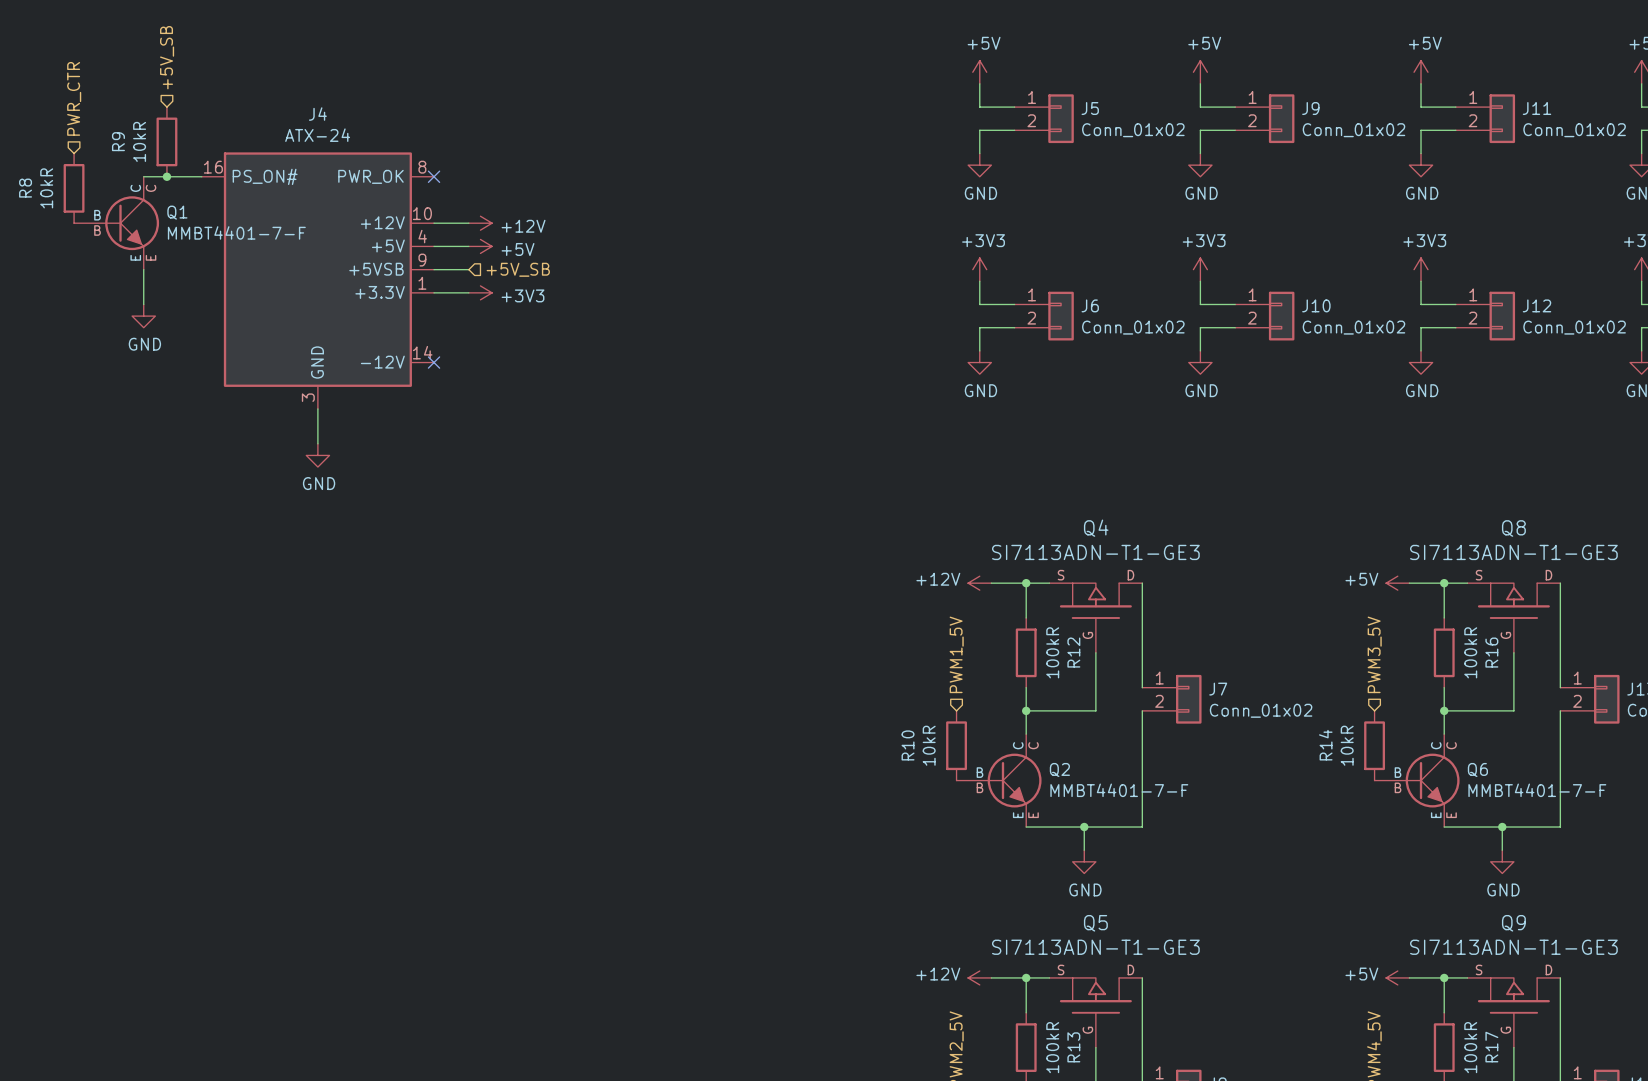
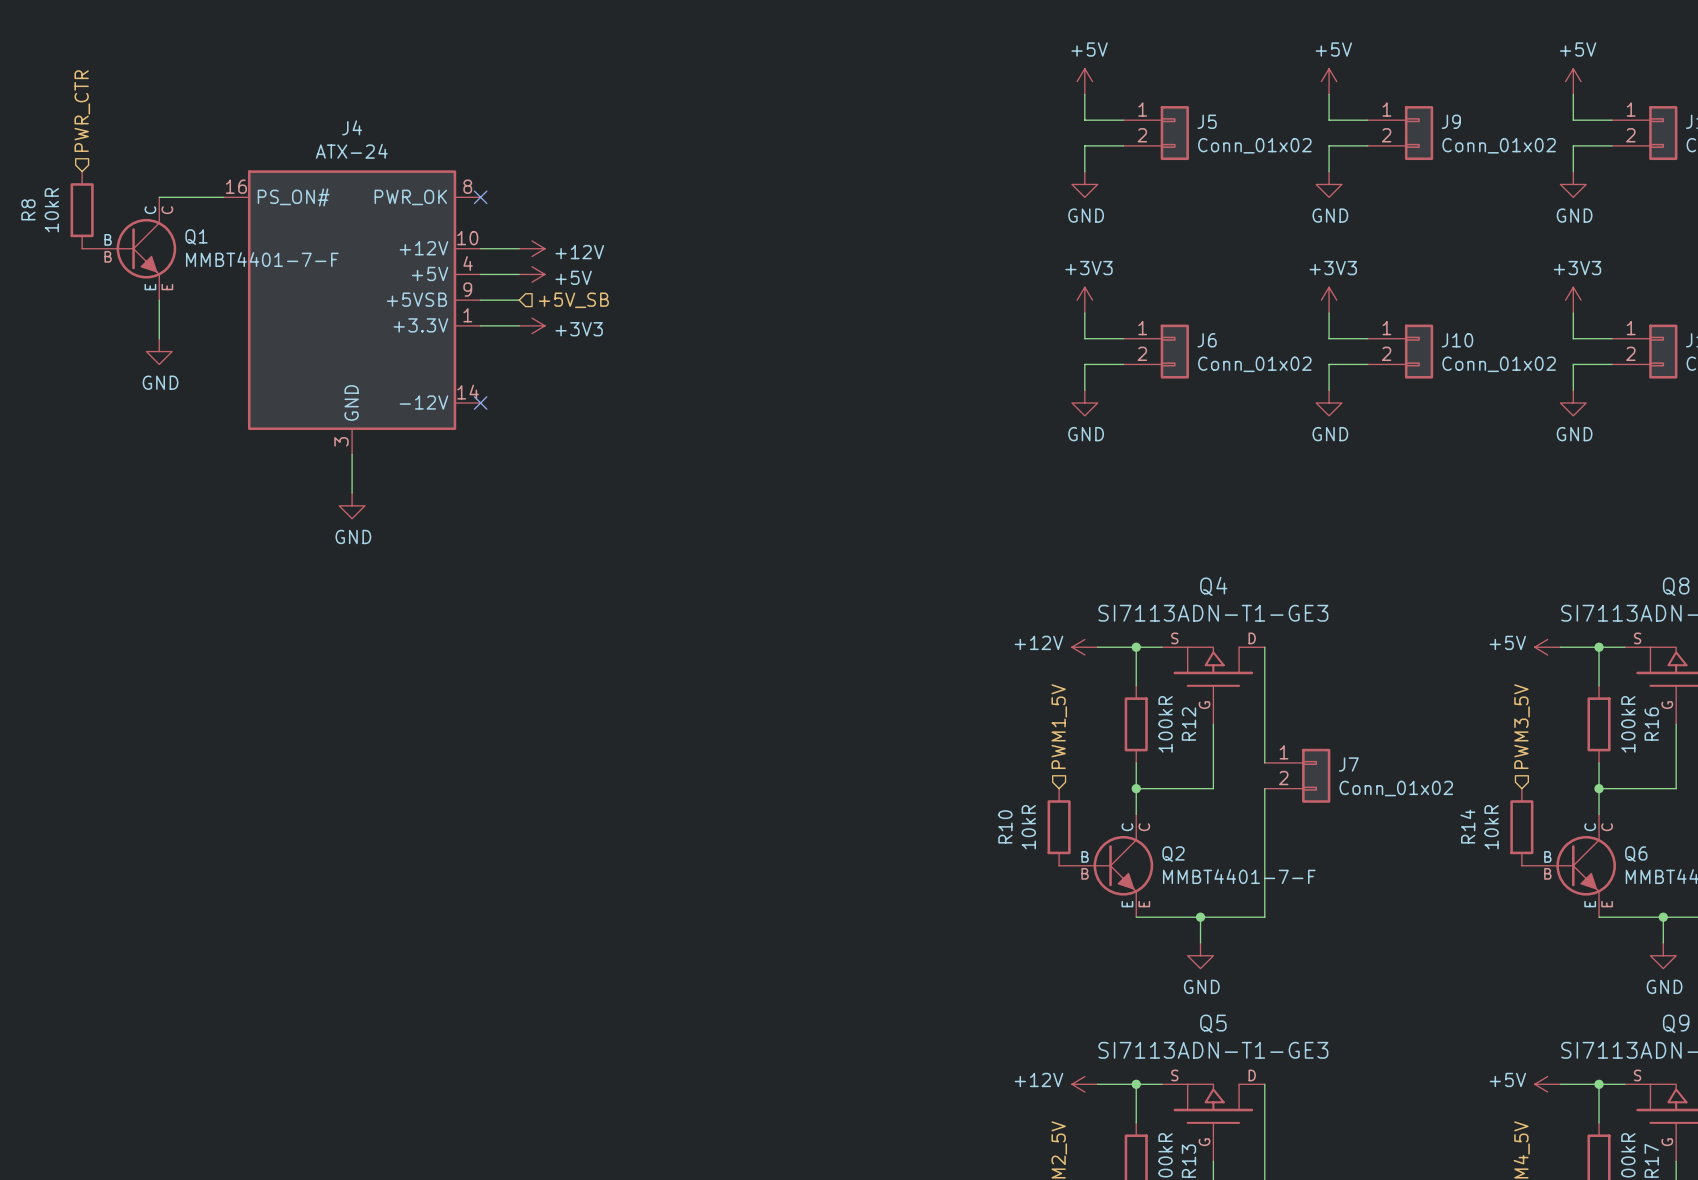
hierarchical label: +5V_SB (167, 57) -> none
R9: 10kR (166, 141) -> none
junction: (166, 176) -> none

